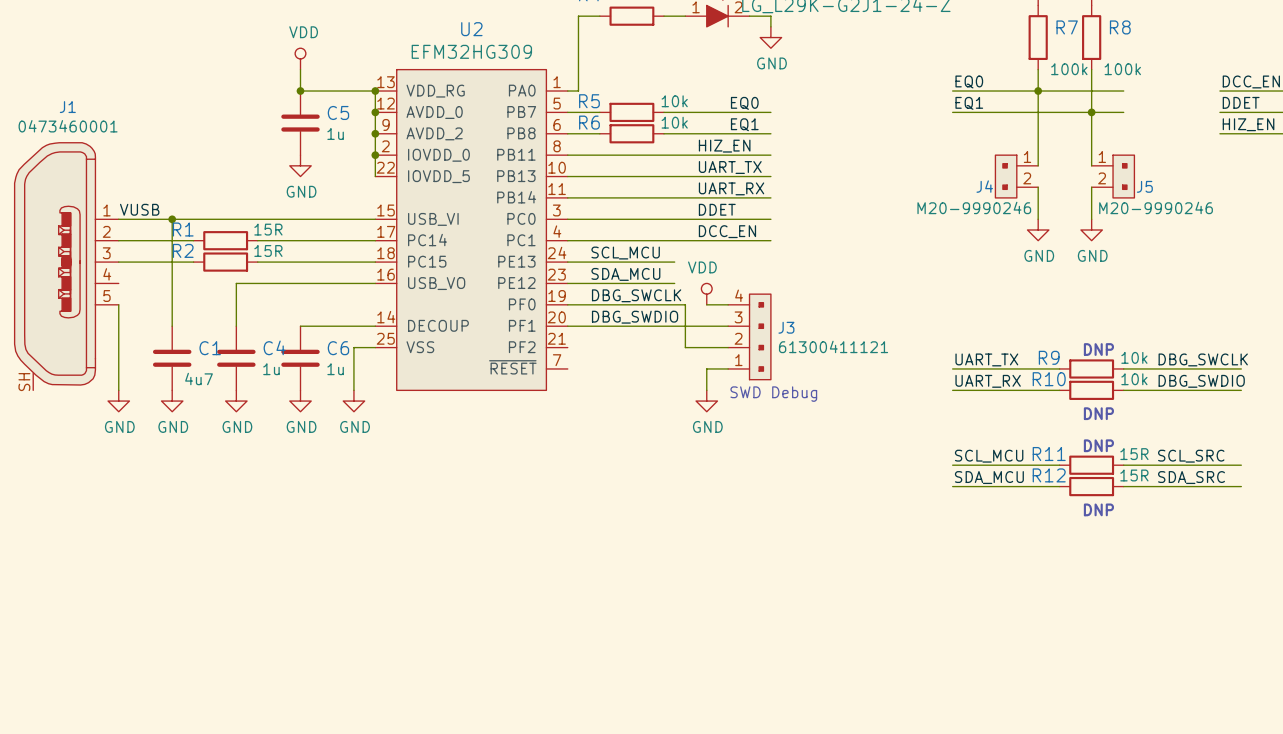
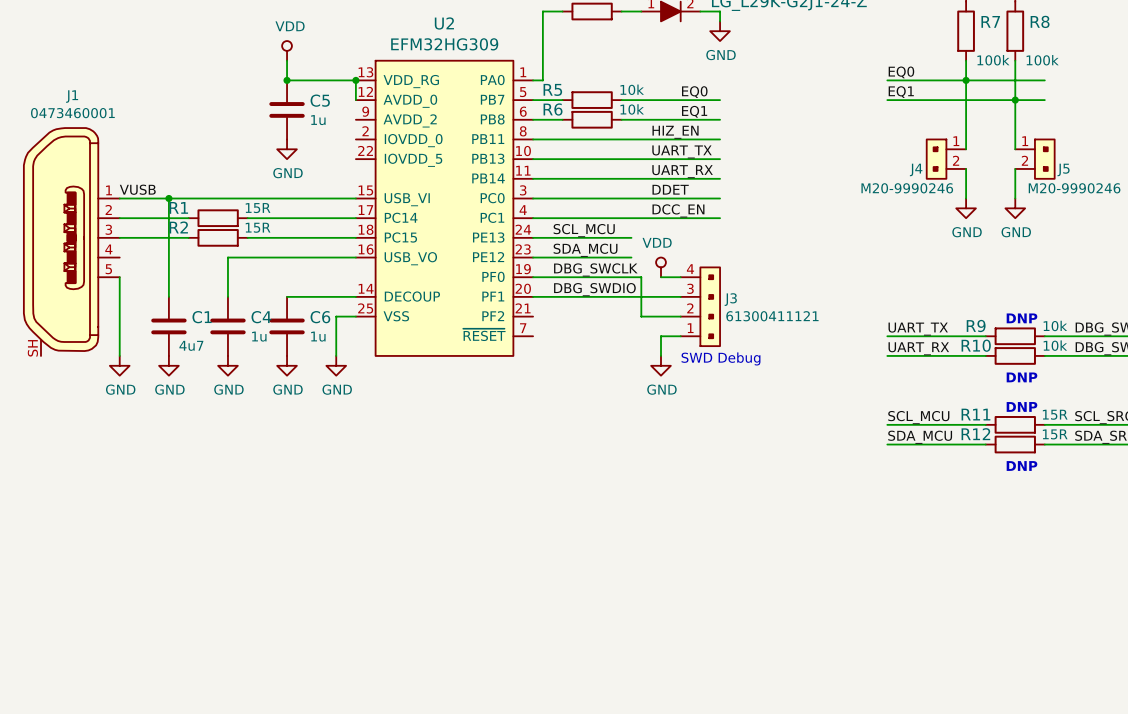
wire: (375, 112) (375, 176) -> none
junction: (375, 112) -> none
junction: (375, 133) -> none
junction: (375, 155) -> none

